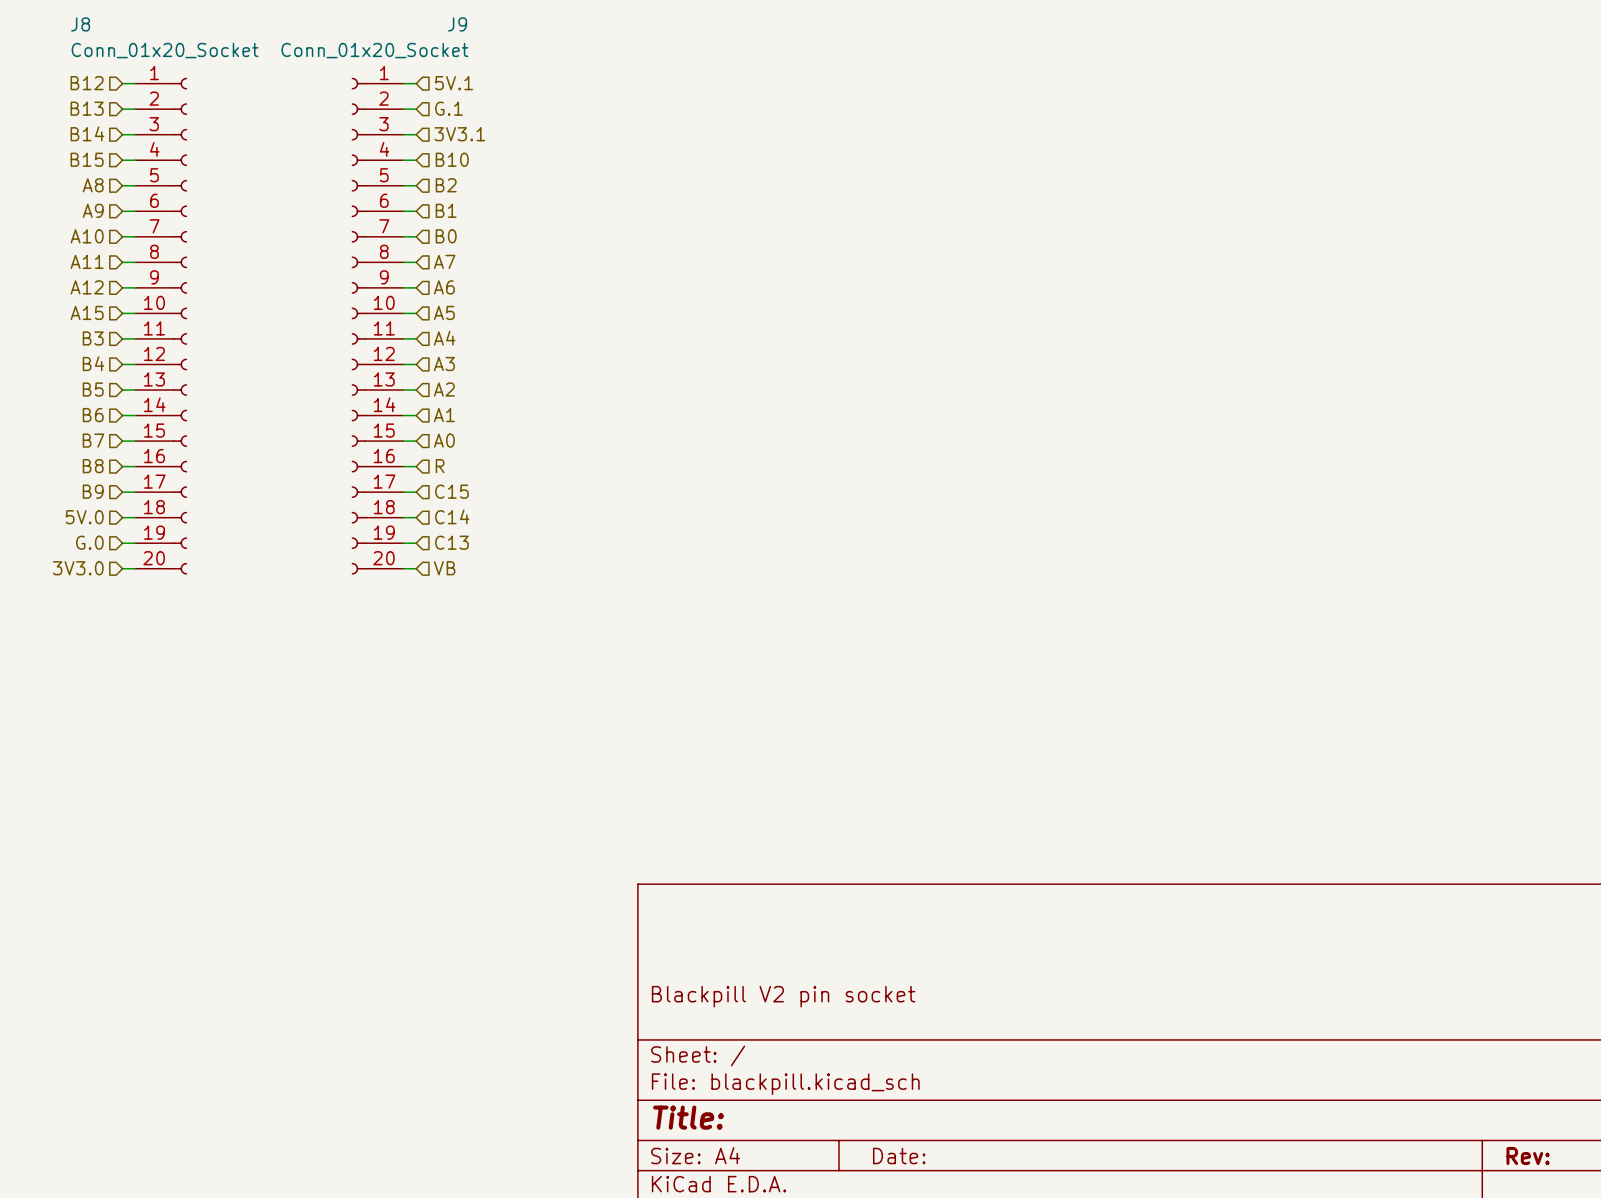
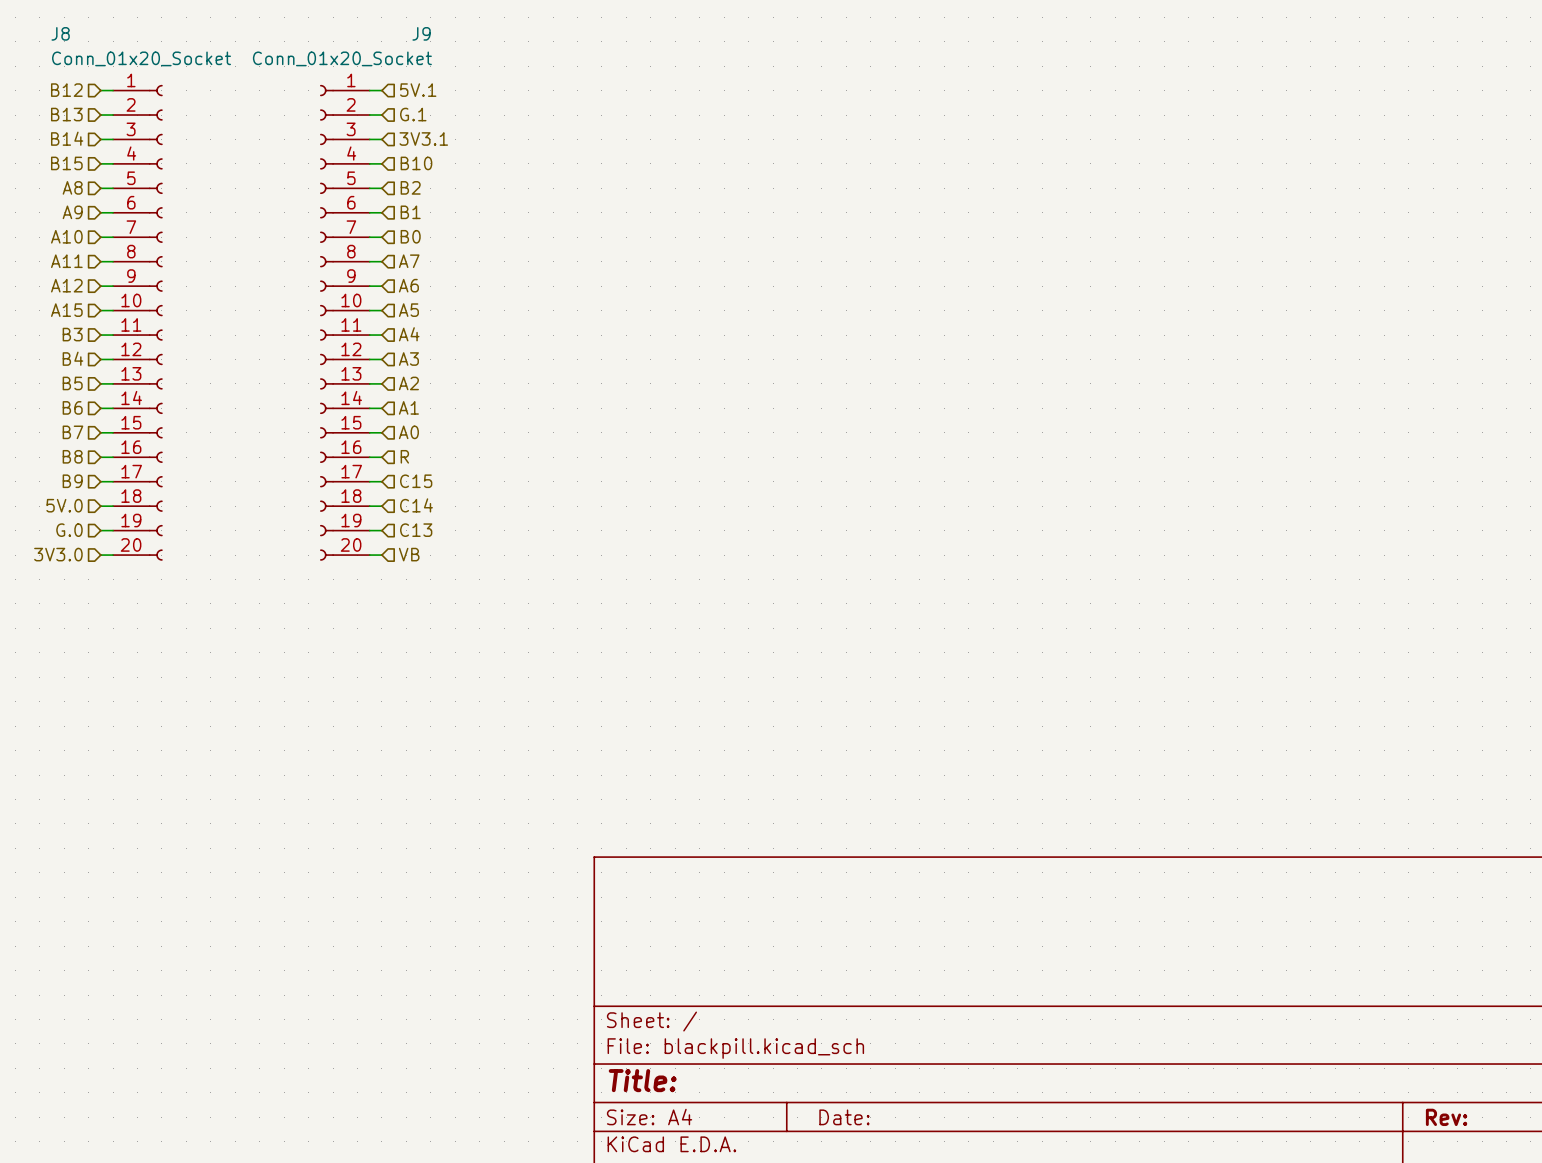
title block: Blackpill V2 pin socket (783, 996) -> none

